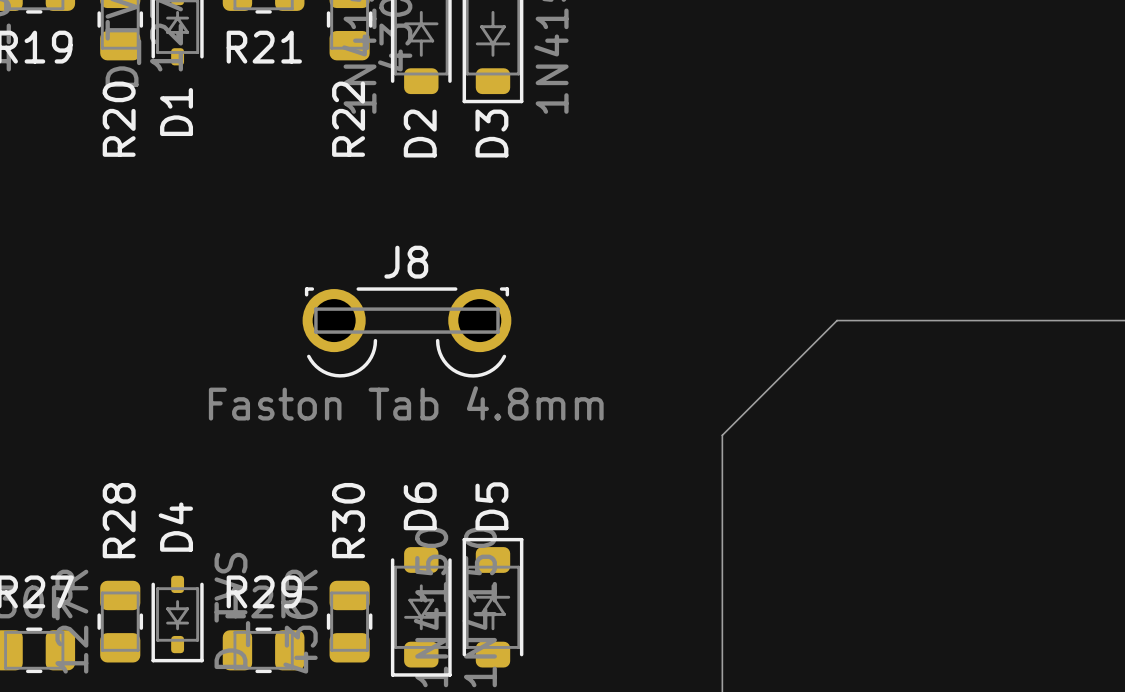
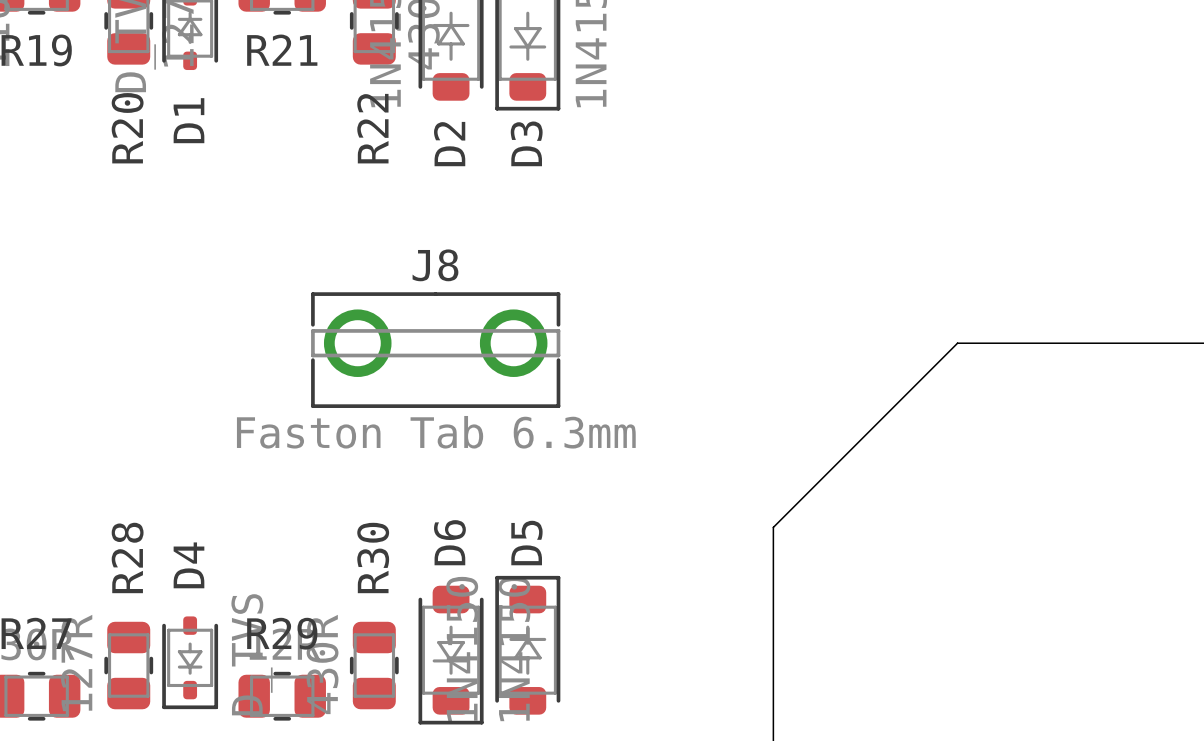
J8 footprint: [302, 287, 512, 378] -> [311, 292, 561, 408]
board edge: (894, 320) (837, 320) (722, 435) (722, 492) -> (957, 343) (773, 527)
J8 value: Faston Tab 4.8mm (406, 403) -> Faston Tab 6.3mm (436, 432)

